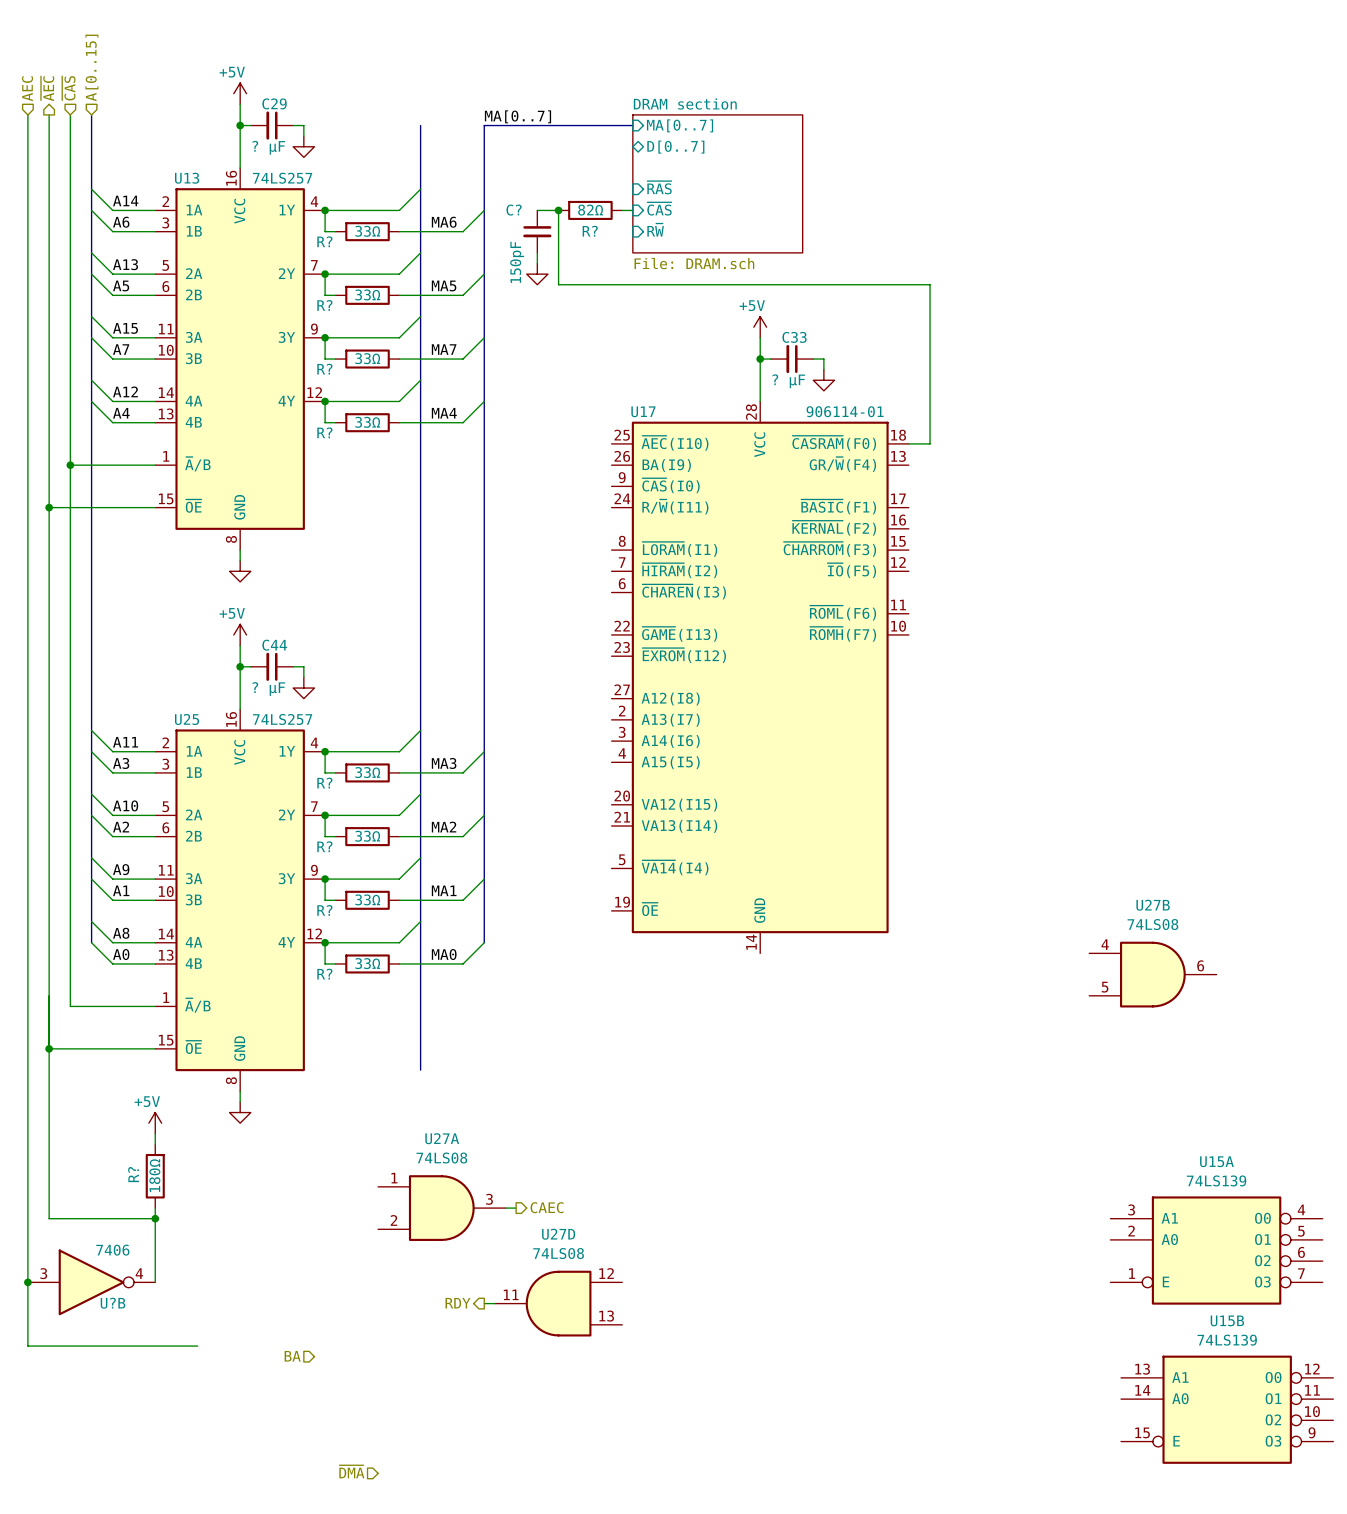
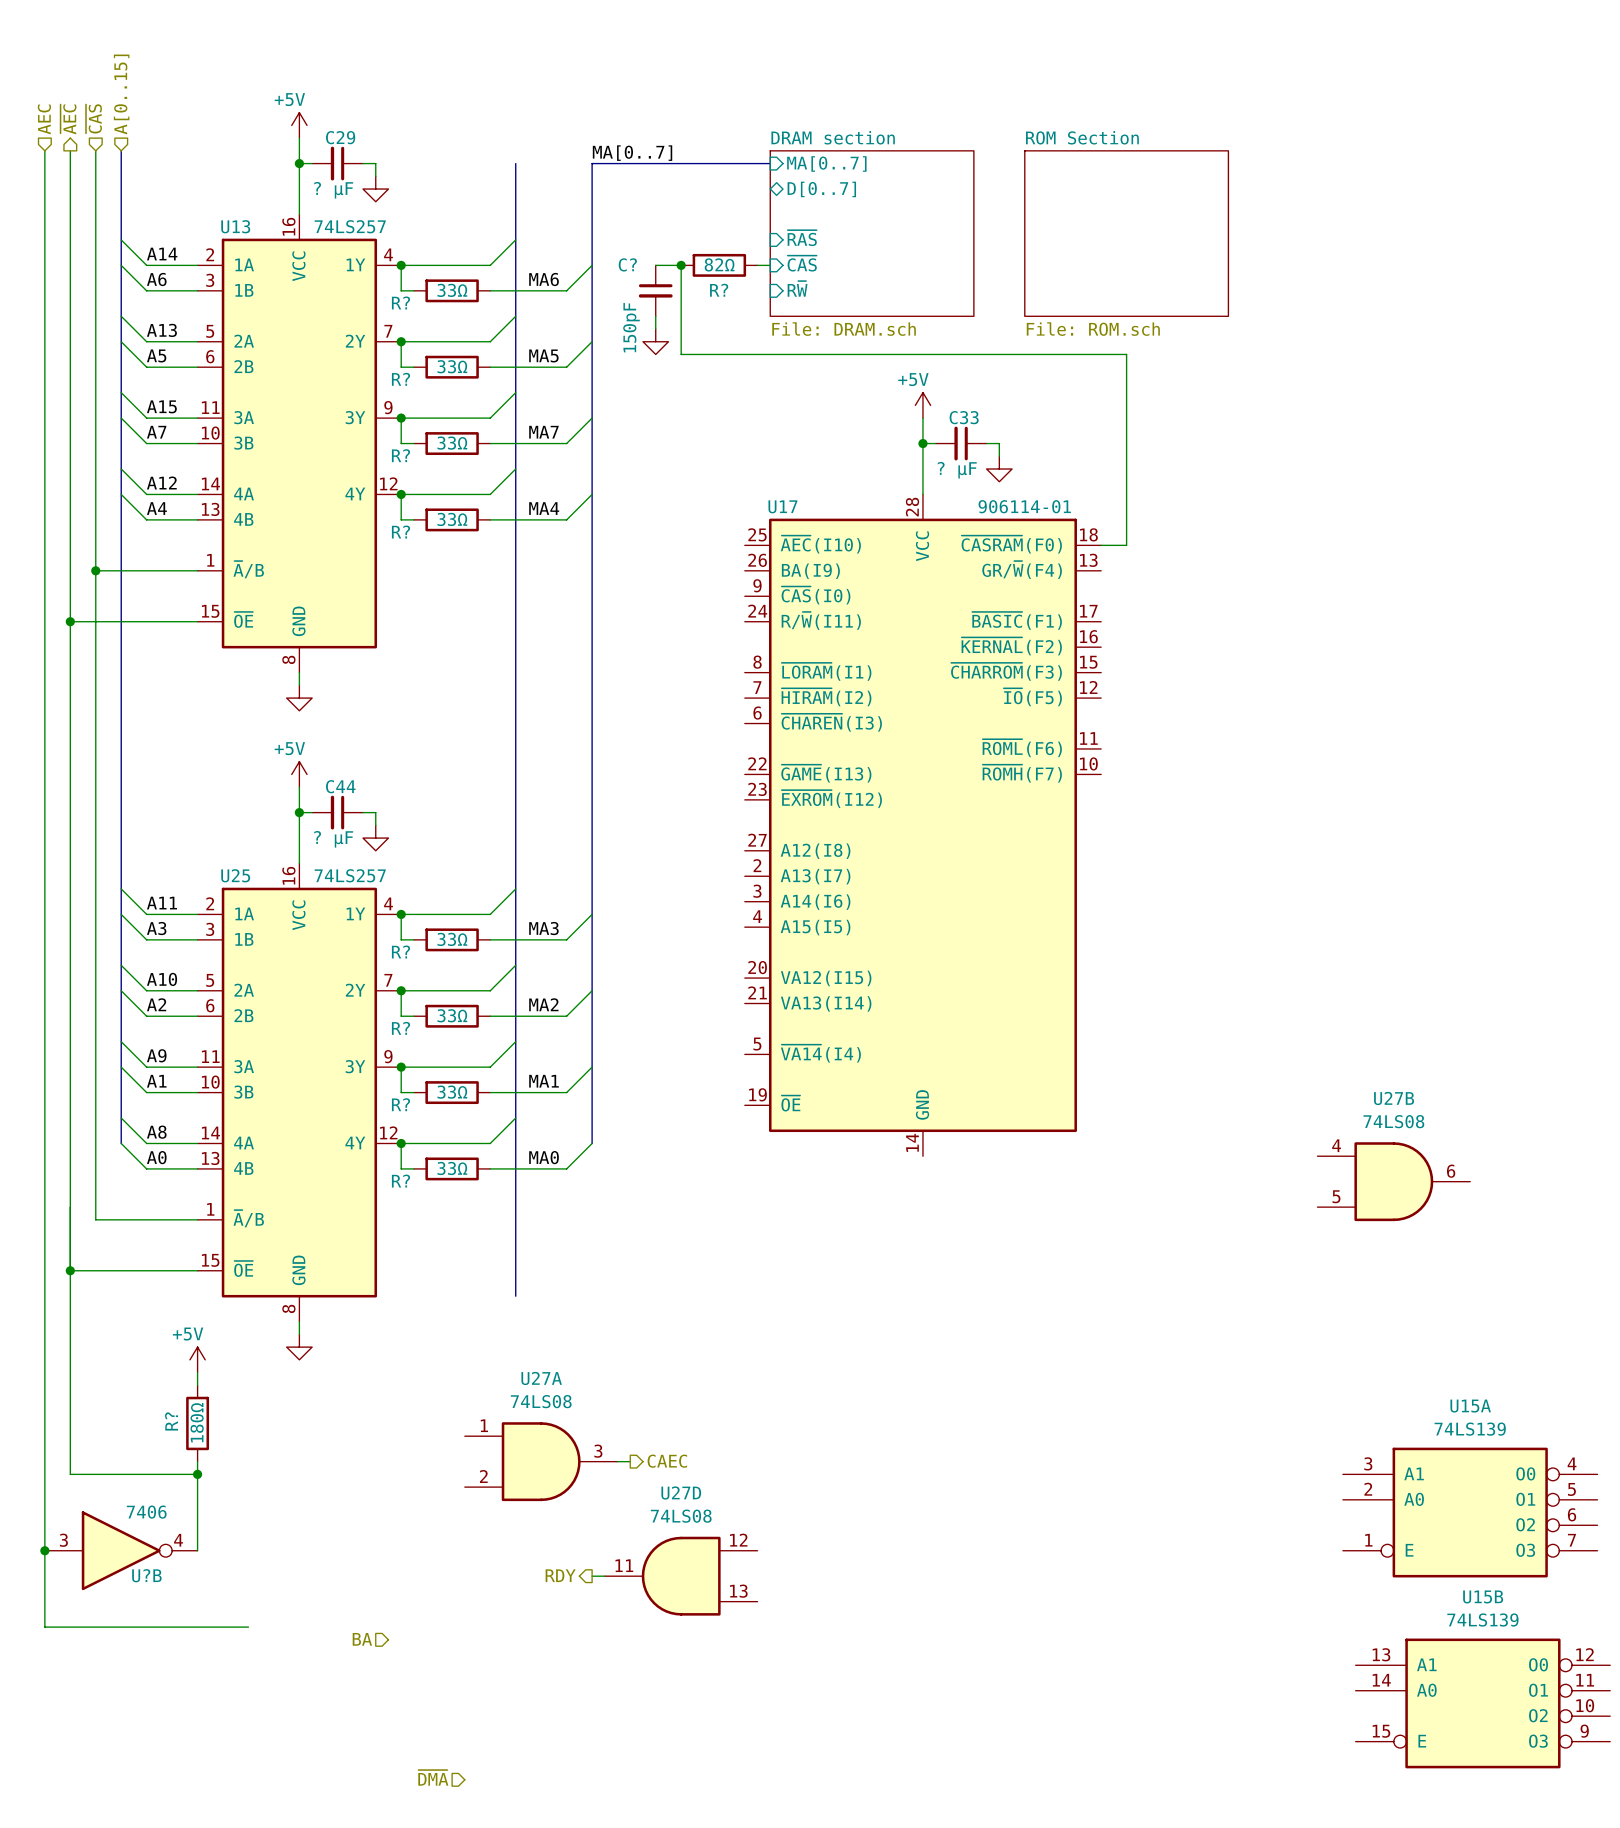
sheet ROM Section: none -> File: ROM.sch (1126, 233)

